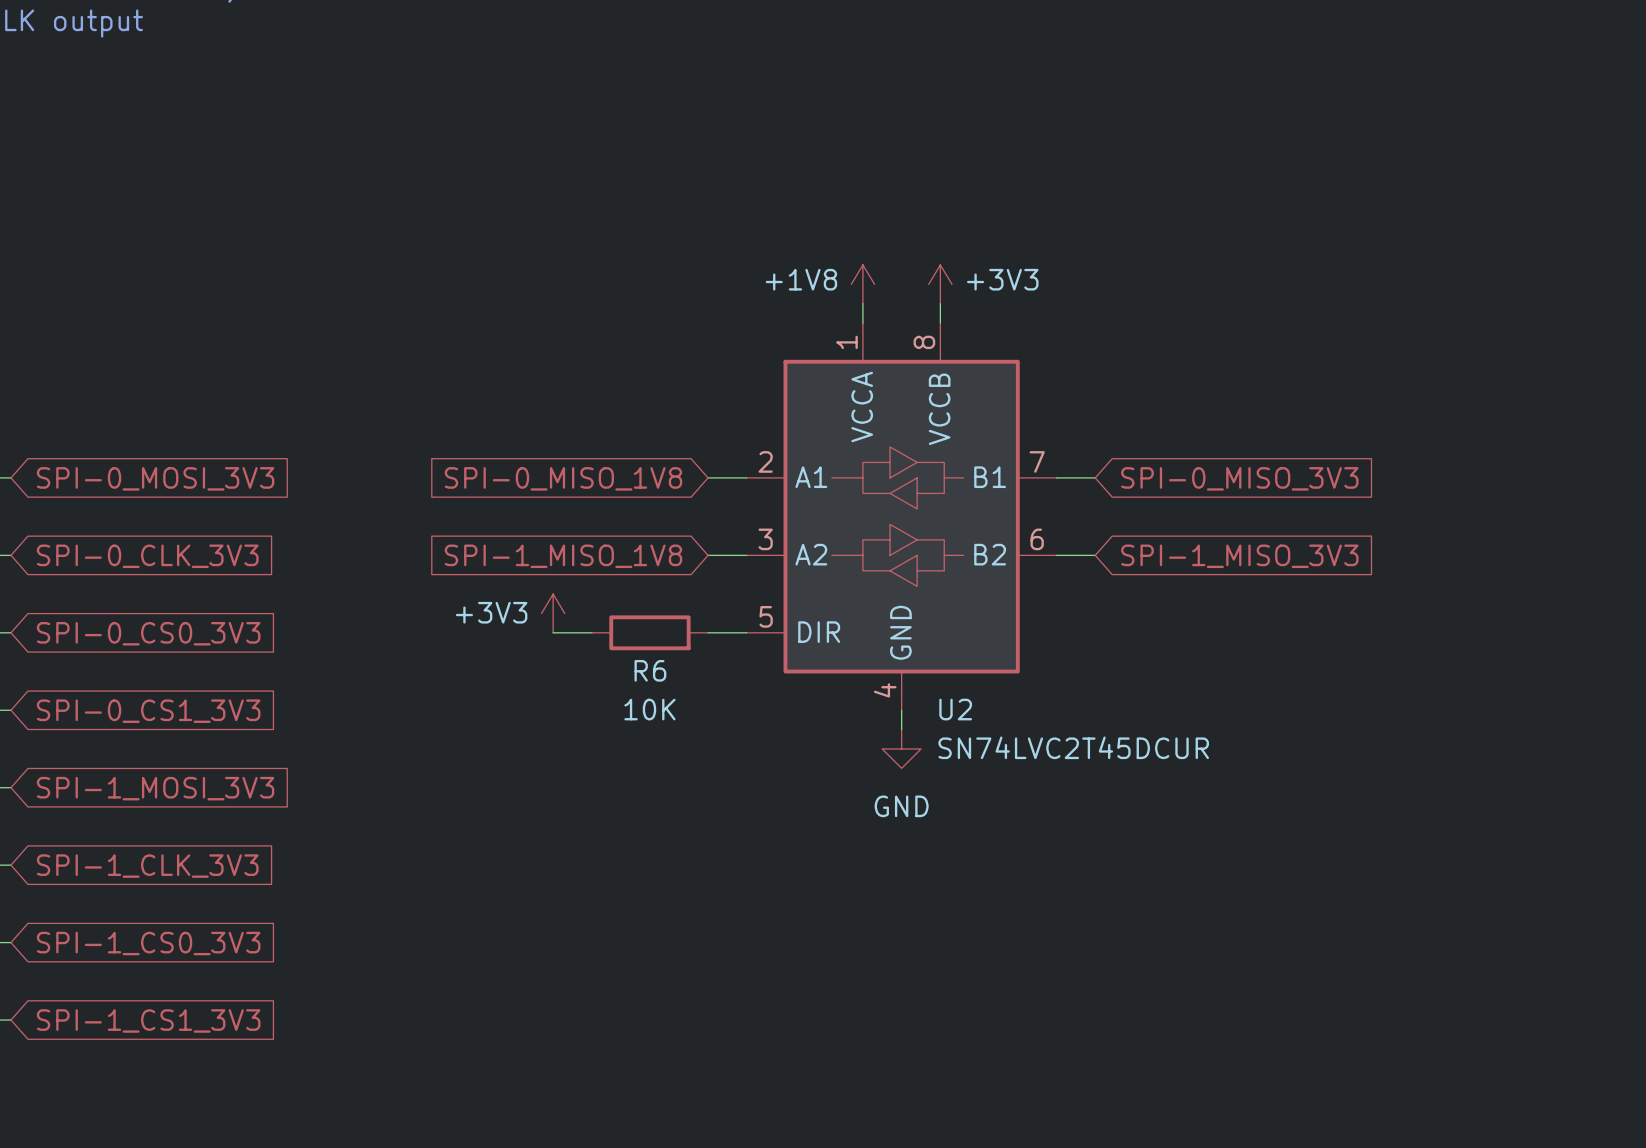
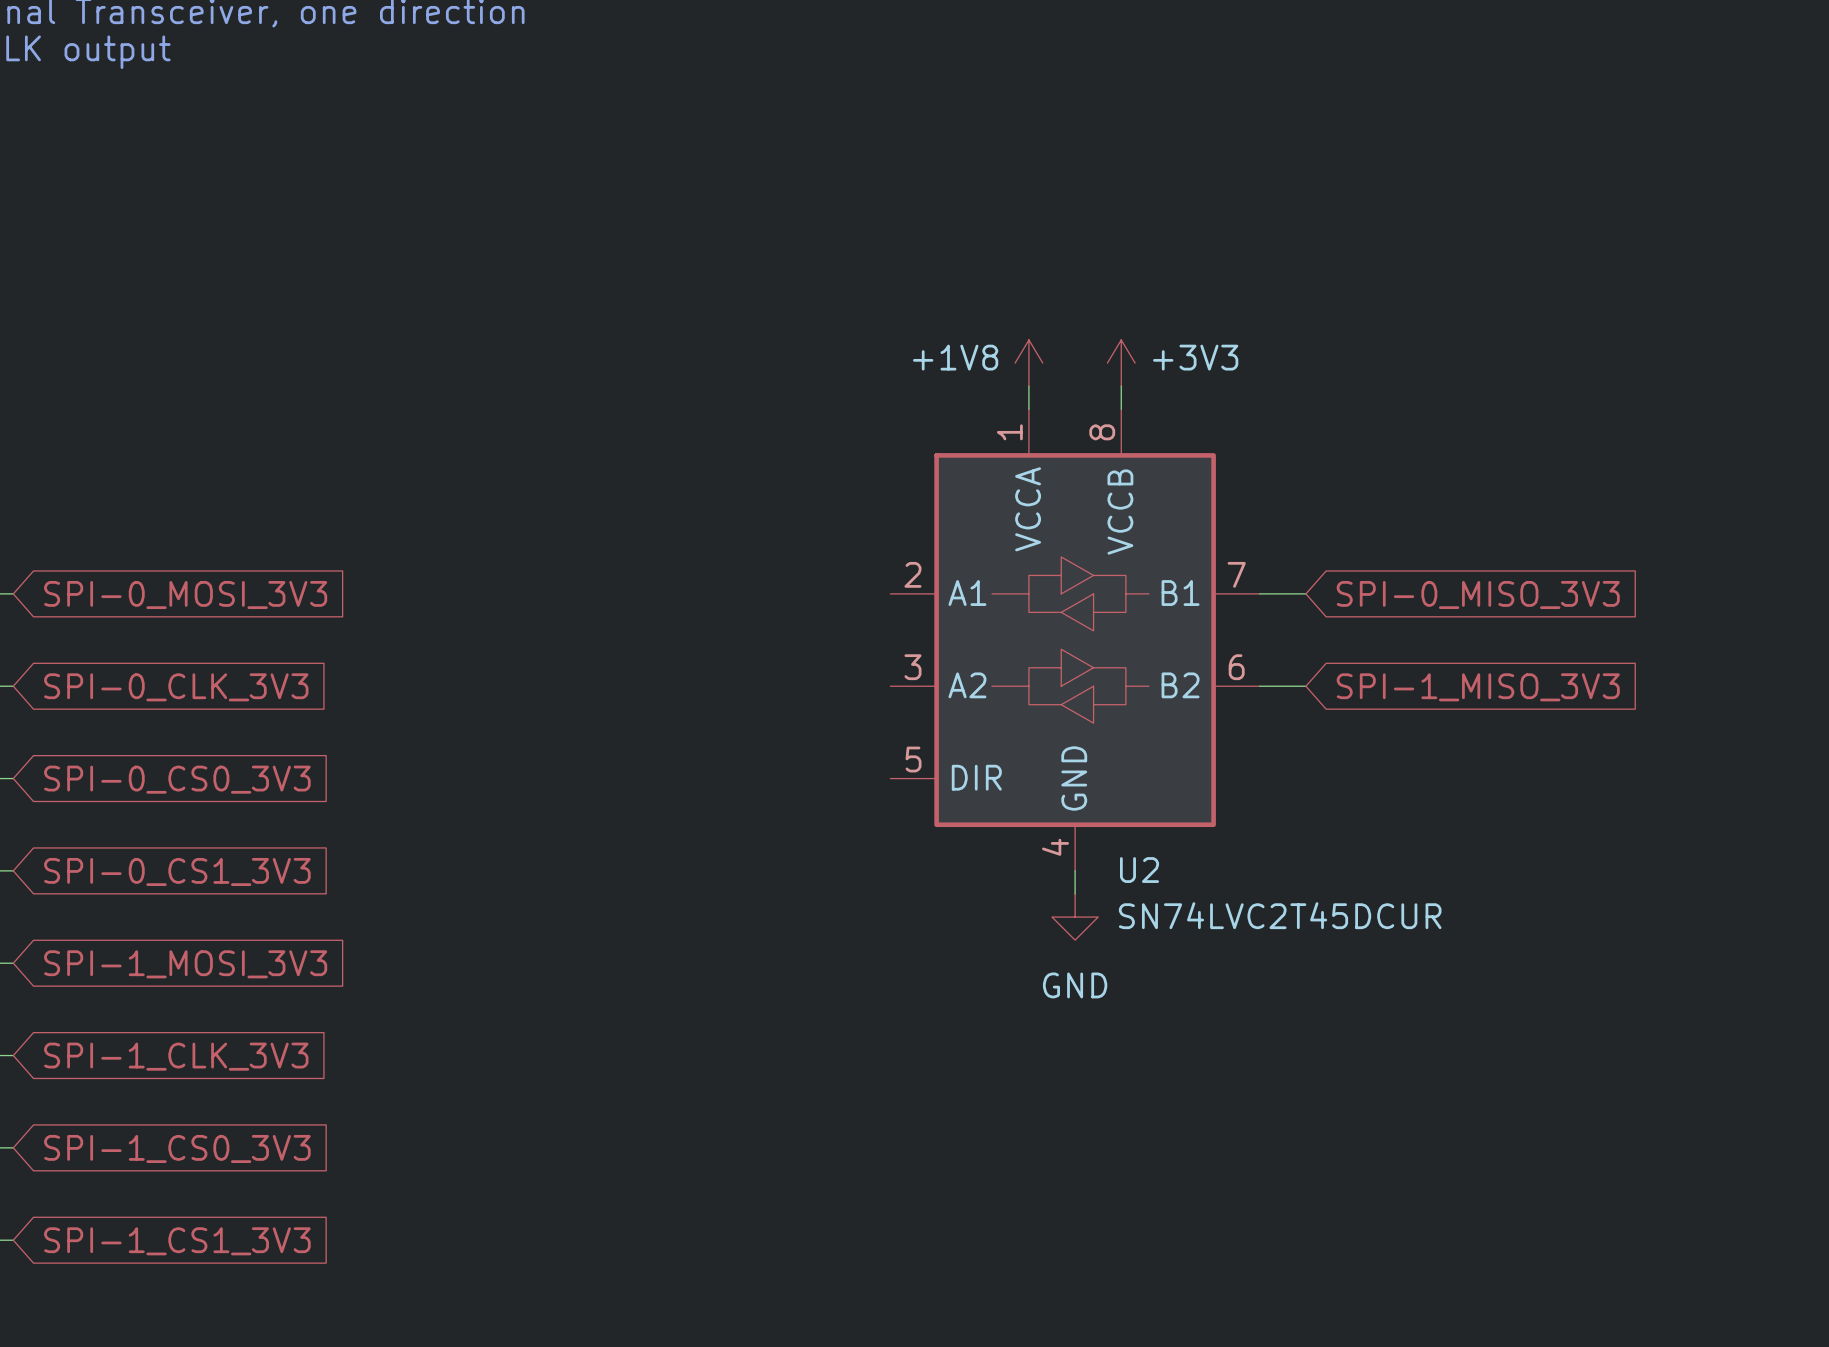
wire: (708, 477) (746, 477) -> none
global label: SPI-0_MISO_1V8 (563, 478) -> none
wire: (708, 555) (746, 555) -> none
global label: SPI-1_MISO_1V8 (563, 556) -> none
power symbol: +3V3 (553, 613) -> none
wire: (553, 632) (591, 632) -> none
R6: 10K (649, 632) -> none
wire: (708, 632) (746, 632) -> none

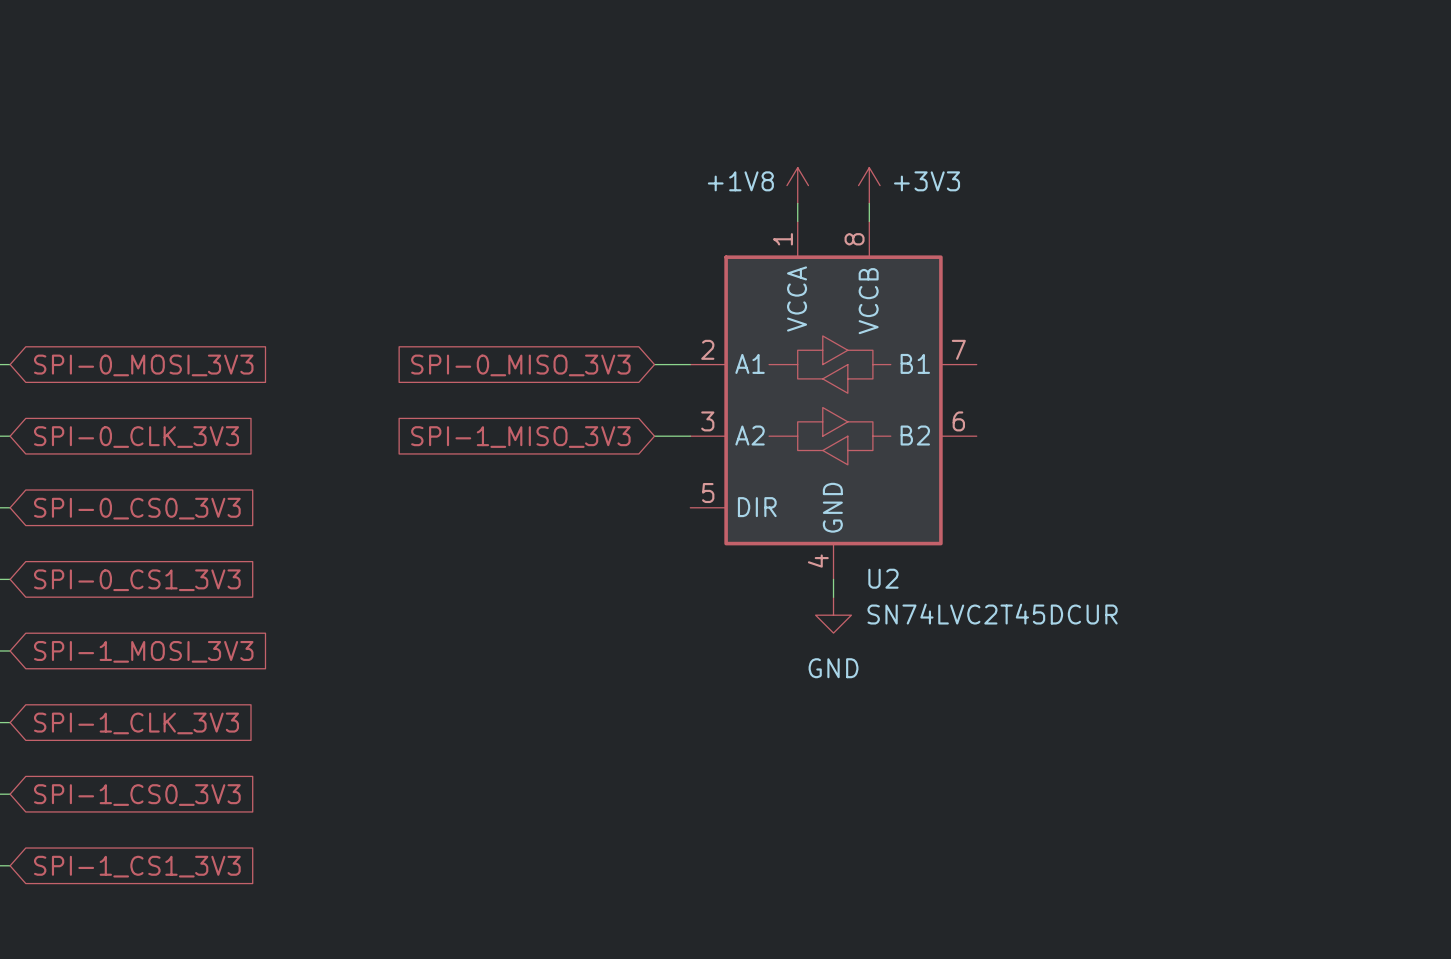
wire: (1259, 593) (1305, 593) -> (654, 364) (690, 364)
global label: none -> SPI-0_MISO_3V3 (520, 365)
global label: SPI-0_MISO_3V3 (1478, 595) -> none
wire: (1259, 686) (1305, 686) -> (654, 436) (690, 436)
global label: none -> SPI-1_MISO_3V3 (520, 437)
global label: SPI-1_MISO_3V3 (1478, 687) -> none

